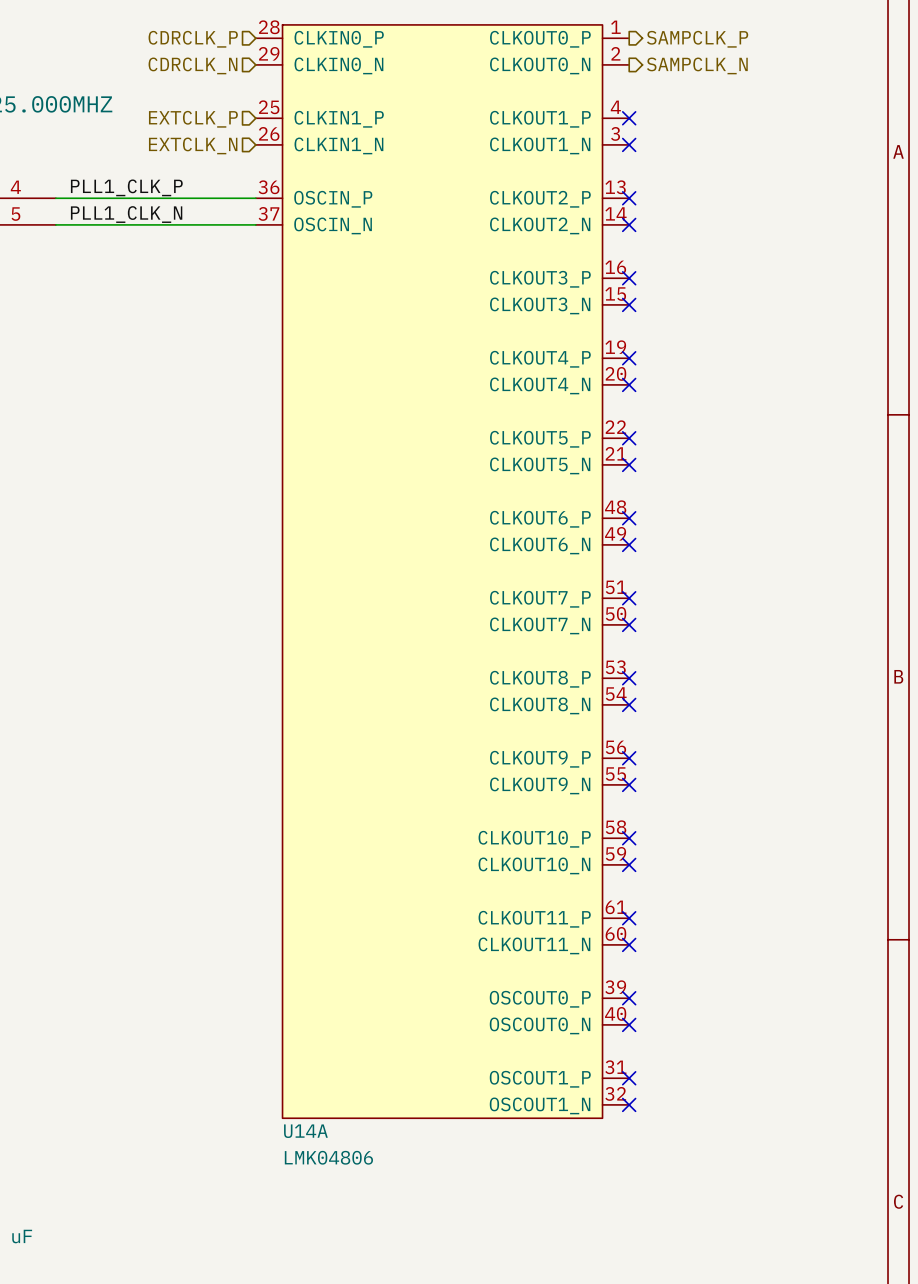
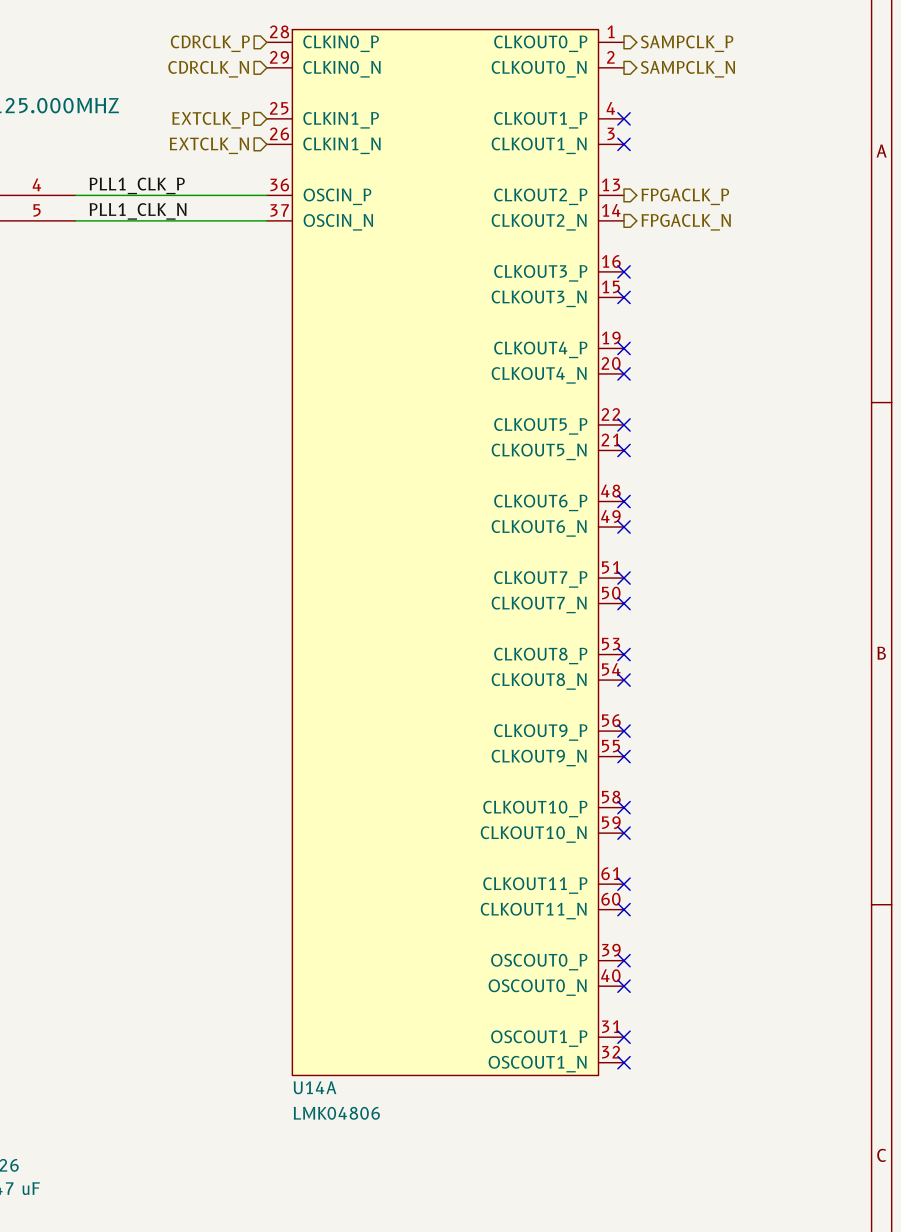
no-connect mark: (629, 198) -> none
hierarchical label: none -> FPGACLK_P (685, 196)
no-connect mark: (629, 224) -> none
hierarchical label: none -> FPGACLK_N (686, 222)

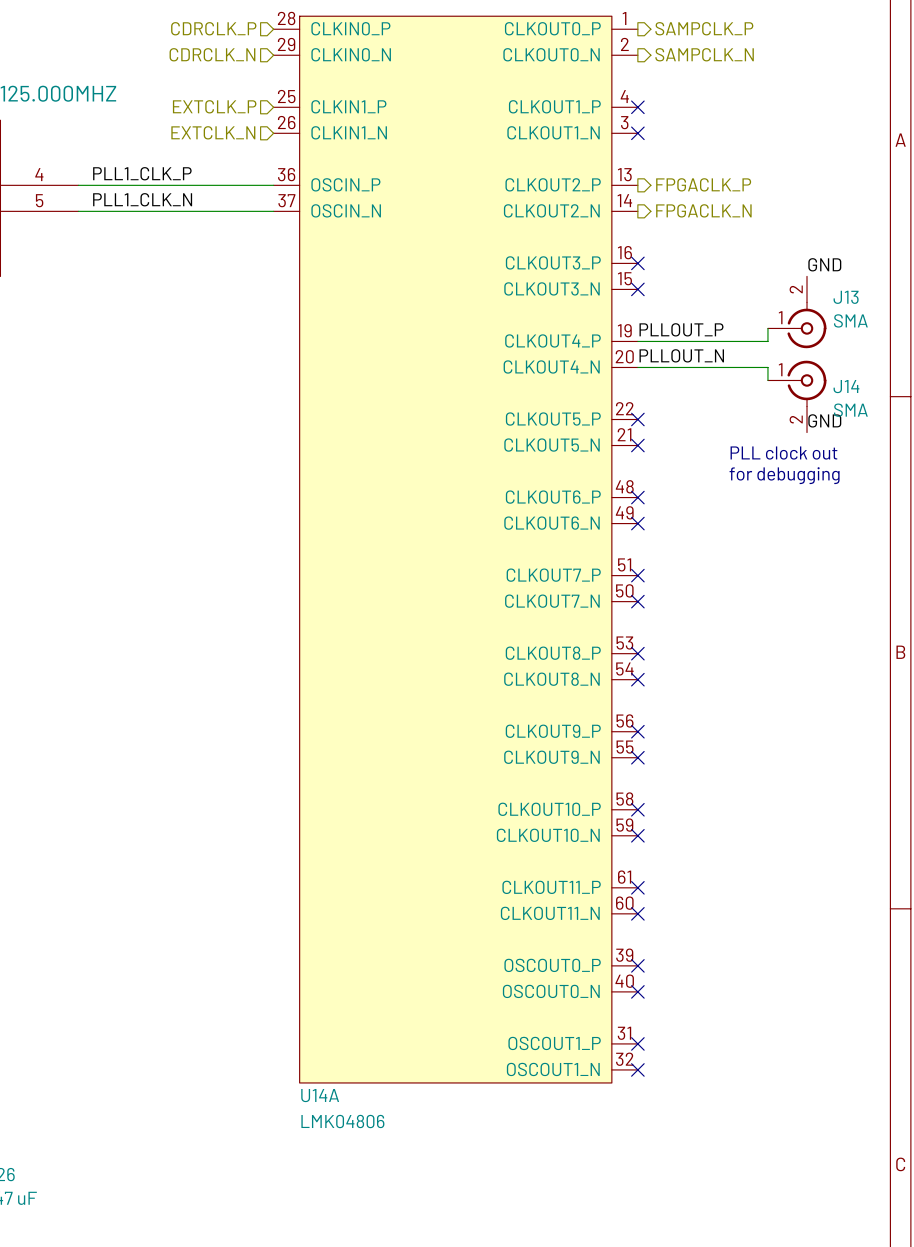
label: none -> GND (824, 264)
J13: none -> SMA (797, 312)
wire: none -> (767, 328) (767, 341) (637, 341)
label: none -> PLLOUT_P (681, 329)
no-connect mark: (624, 348) -> none
label: none -> PLLOUT_N (681, 355)
wire: none -> (637, 367) (767, 367) (767, 380)
no-connect mark: (624, 373) -> none
J14: none -> SMA (797, 396)
label: none -> GND (824, 420)
text: none -> PLL clock out (783, 453)
text: none -> for debugging (784, 475)

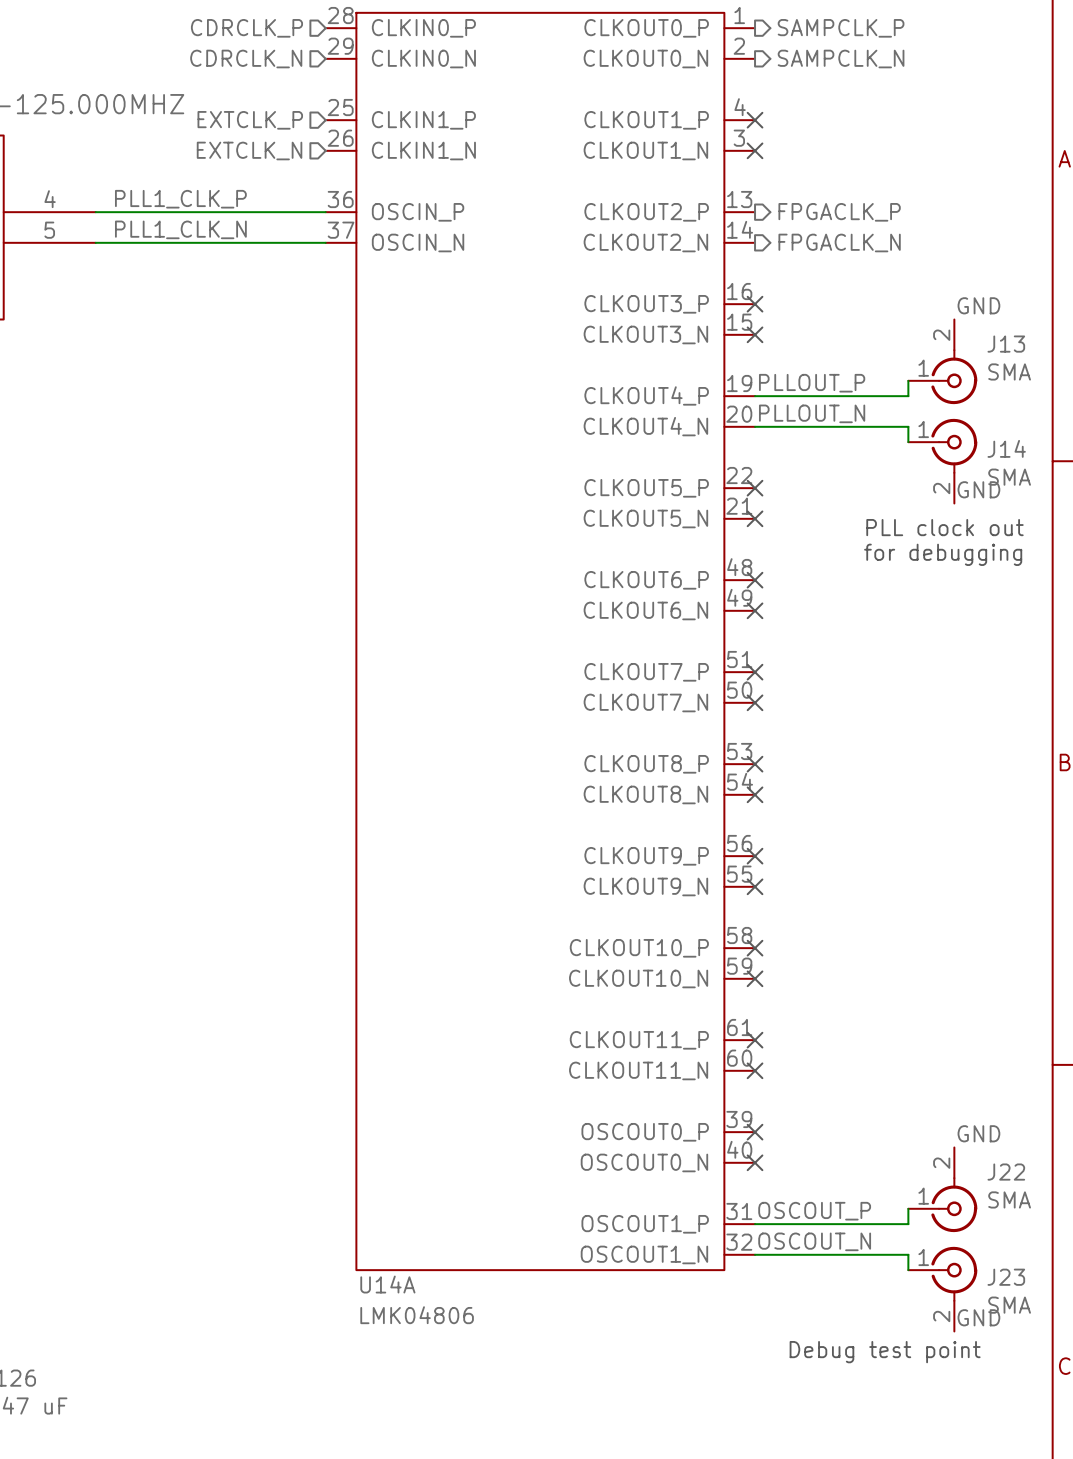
label: none -> GND (978, 1133)
J22: none -> SMA (942, 1189)
wire: none -> (908, 1208) (908, 1224) (755, 1224)
label: none -> OSCOUT_P (814, 1211)
no-connect mark: (637, 1043) -> none
label: none -> OSCOUT_N (814, 1241)
wire: none -> (755, 1254) (908, 1254) (908, 1270)
no-connect mark: (637, 1069) -> none
J23: none -> SMA (942, 1289)
label: none -> GND (978, 1317)
text: none -> Debug test point (885, 1352)

